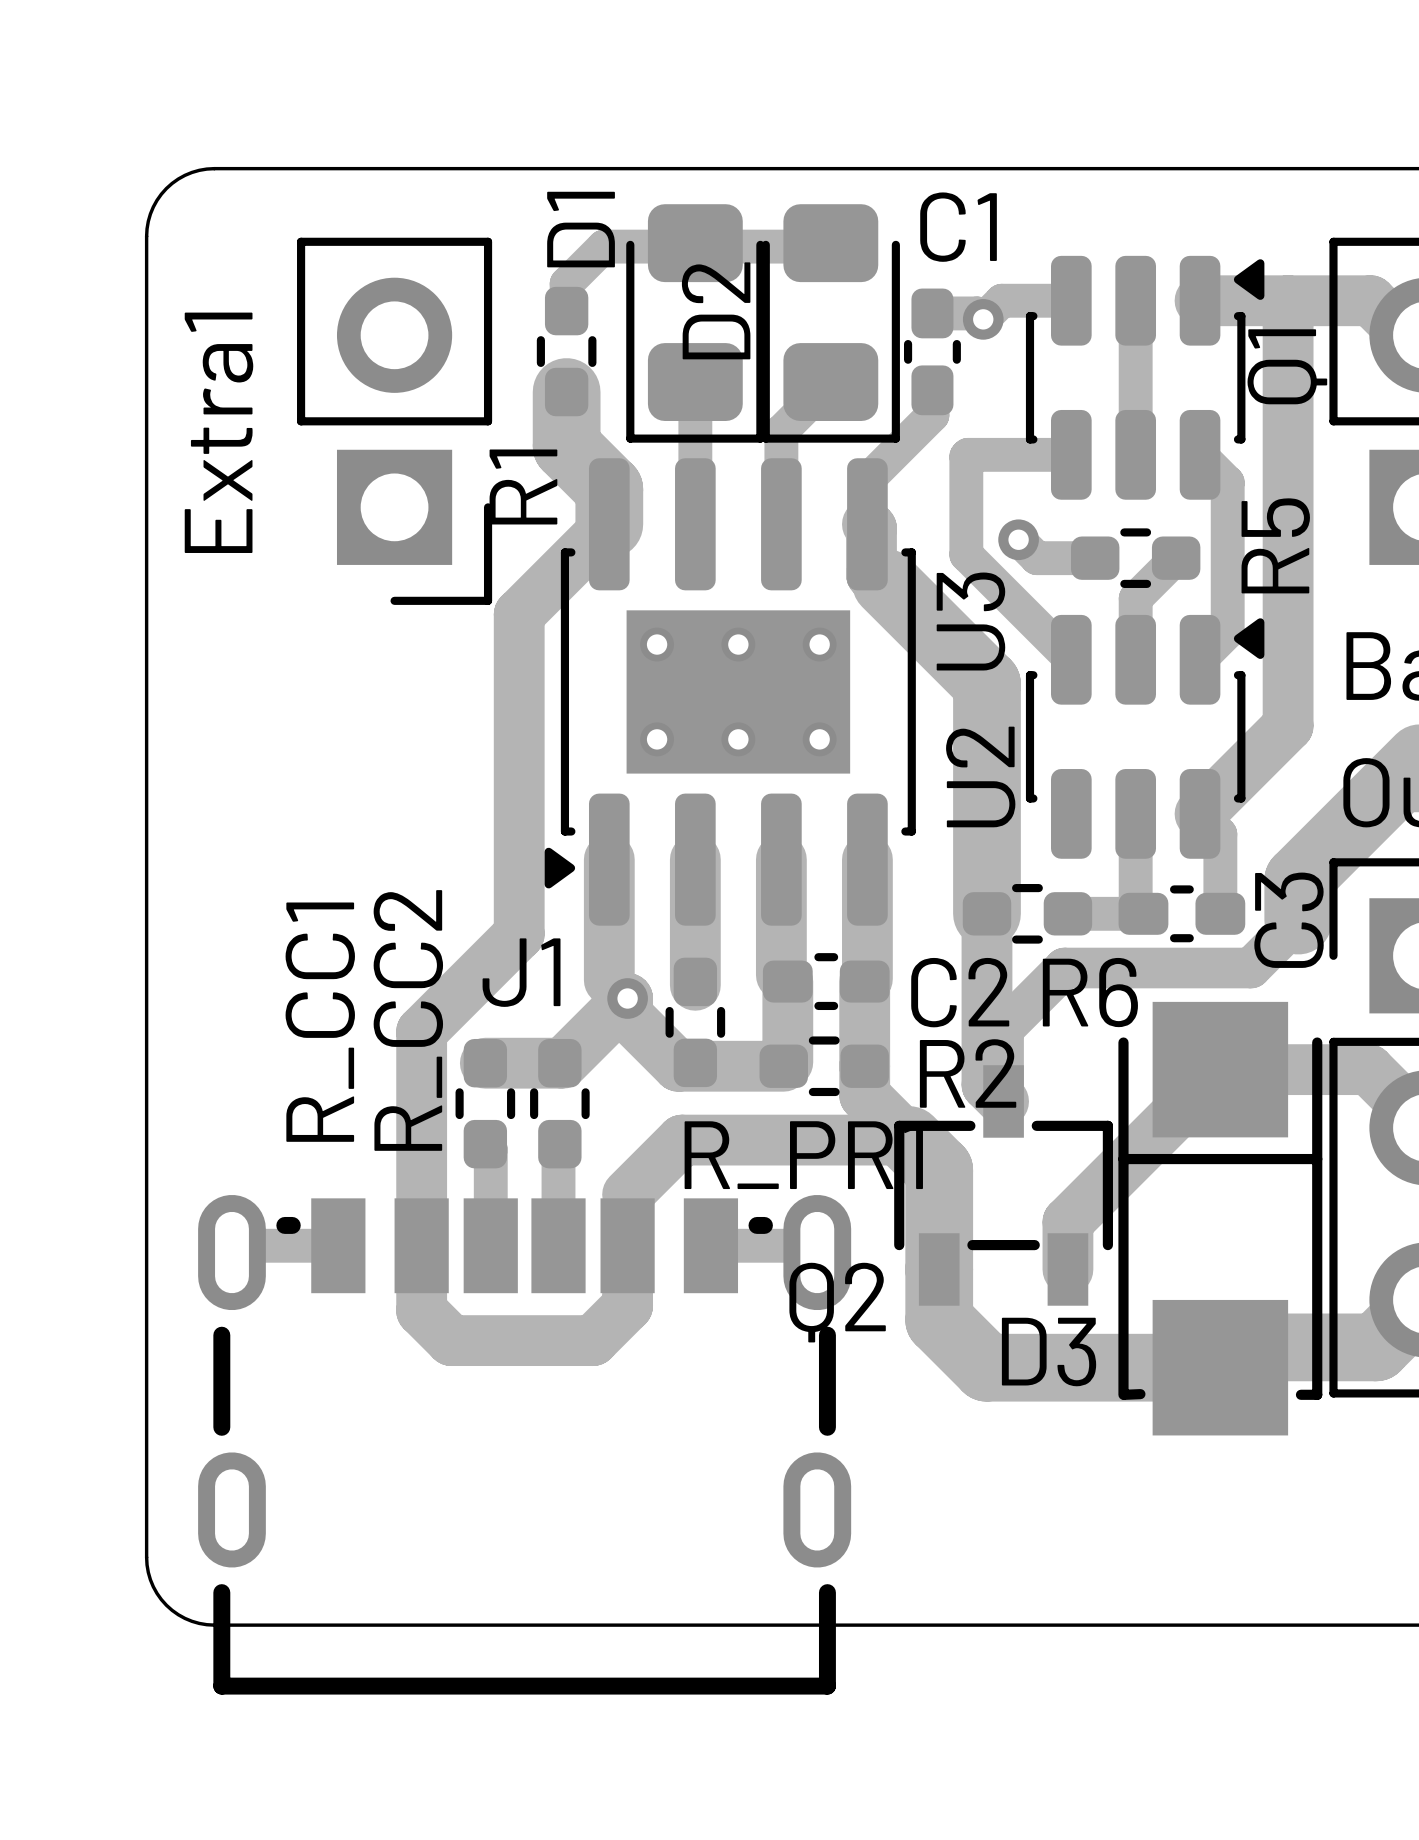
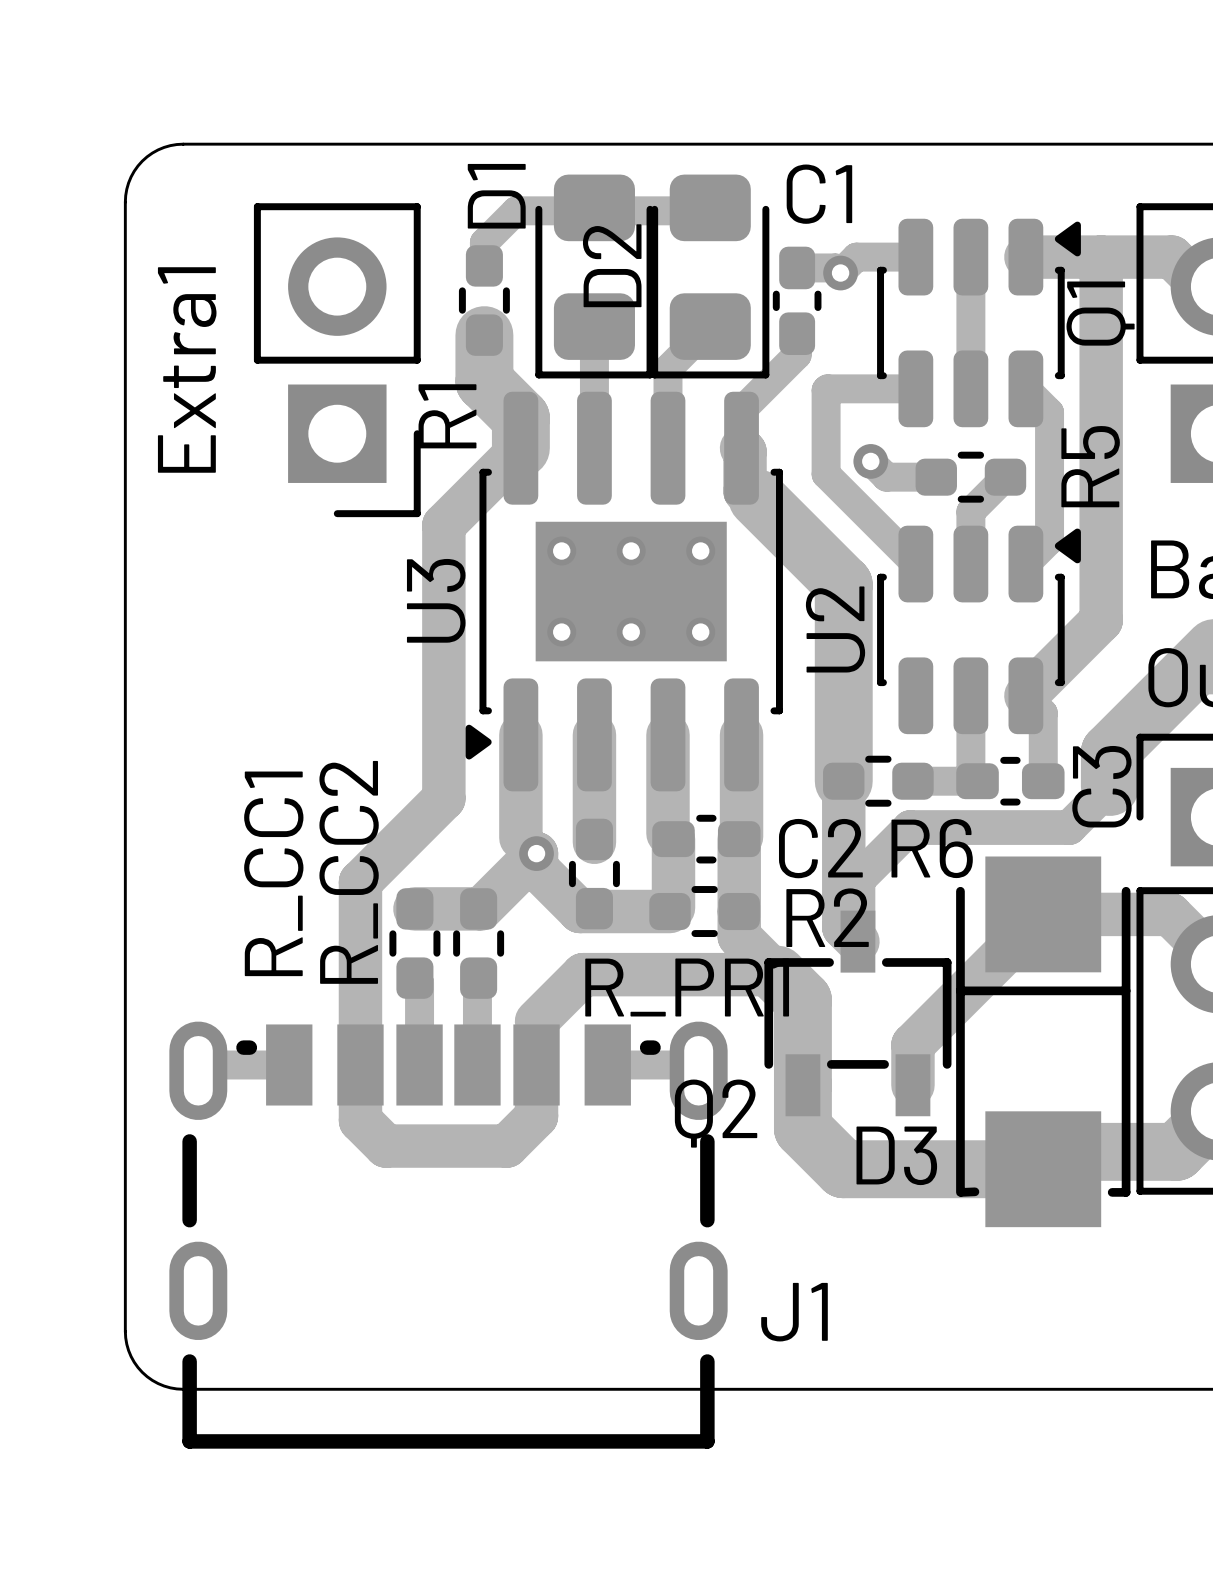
U3 name position: U3 (970, 621) -> U3 (436, 600)
U2 name position: U2 (980, 776) -> U2 (835, 629)
J1 name position: J1 (521, 972) -> J1 (794, 1312)

